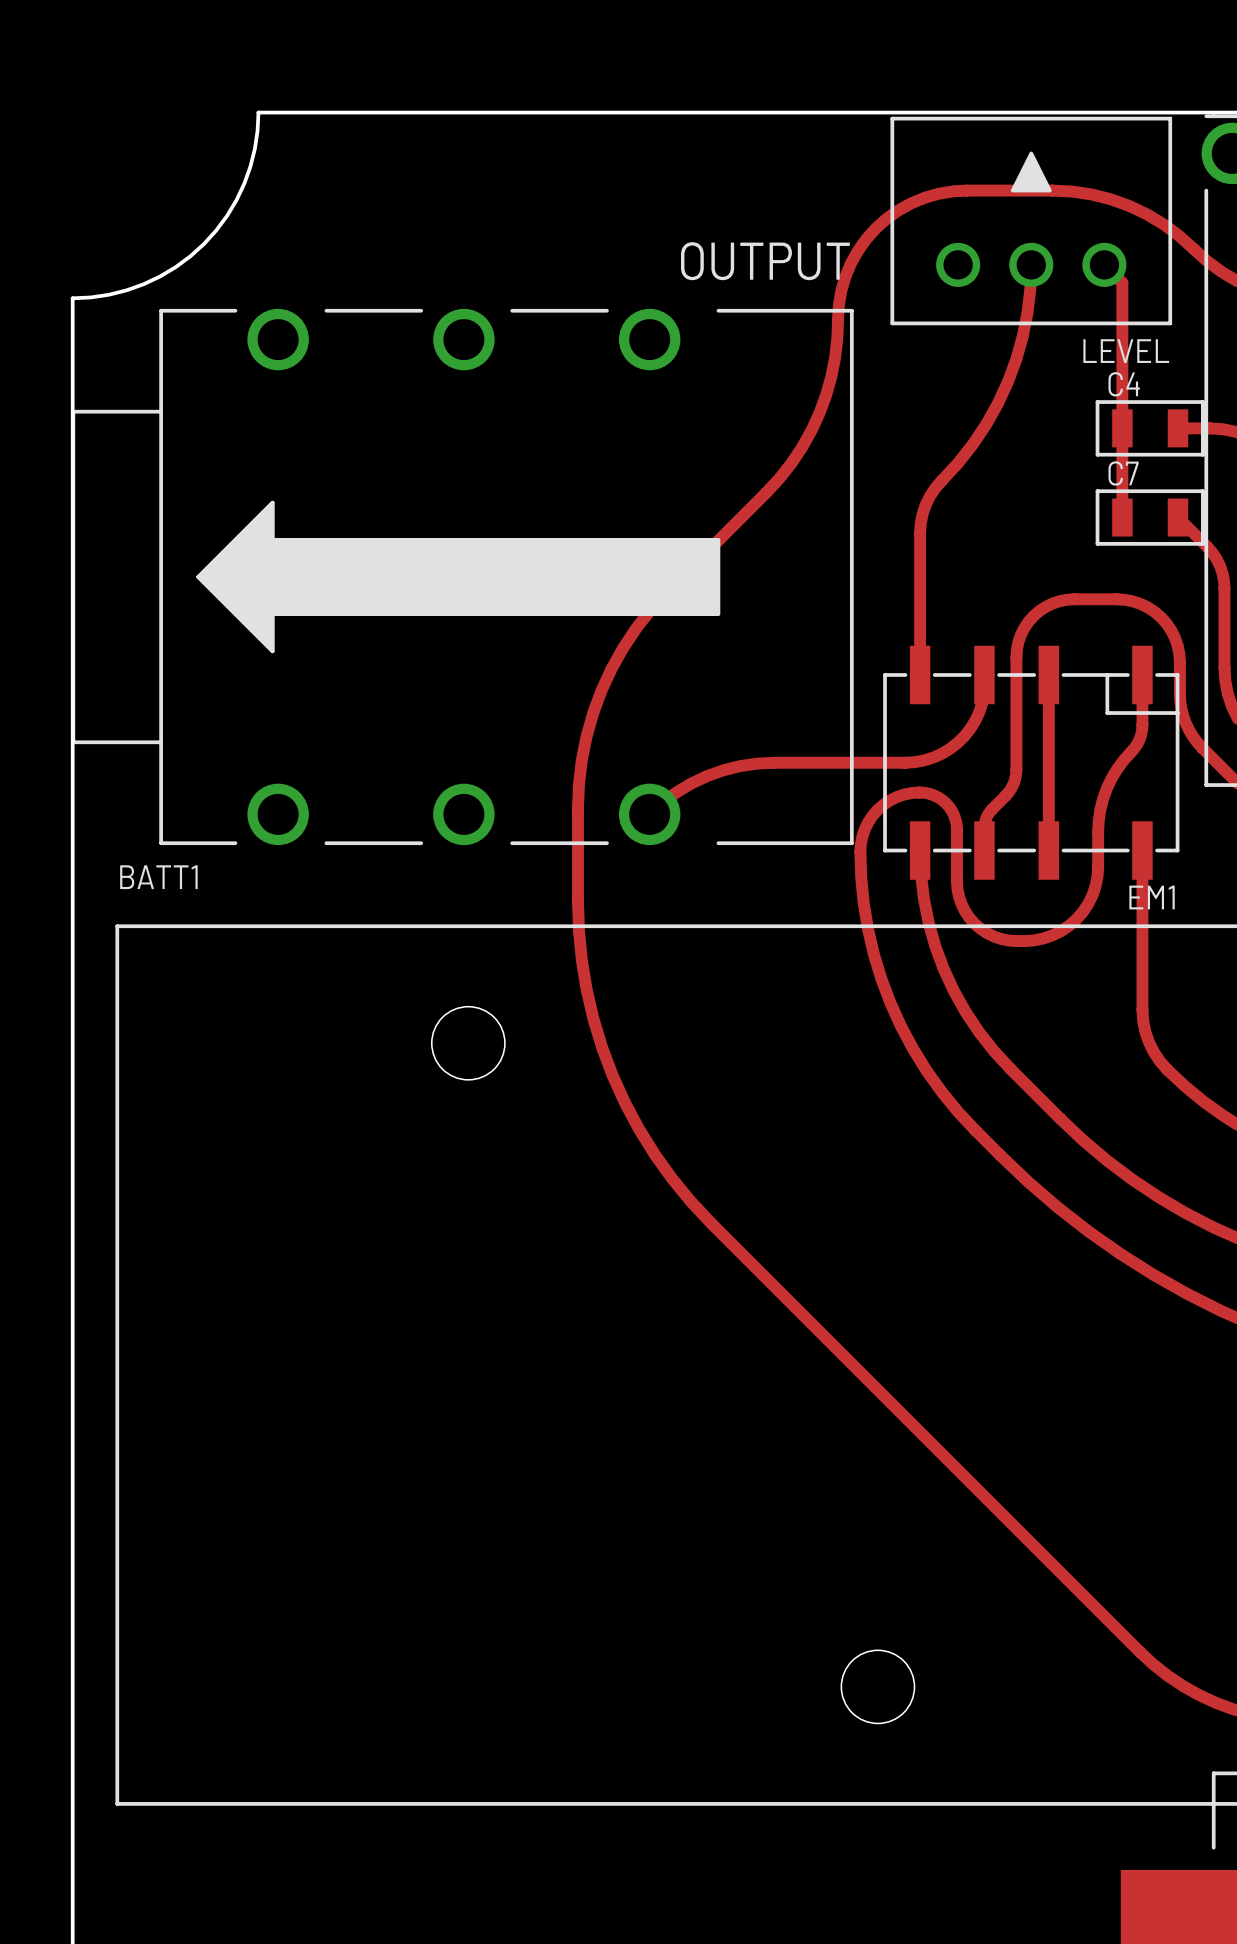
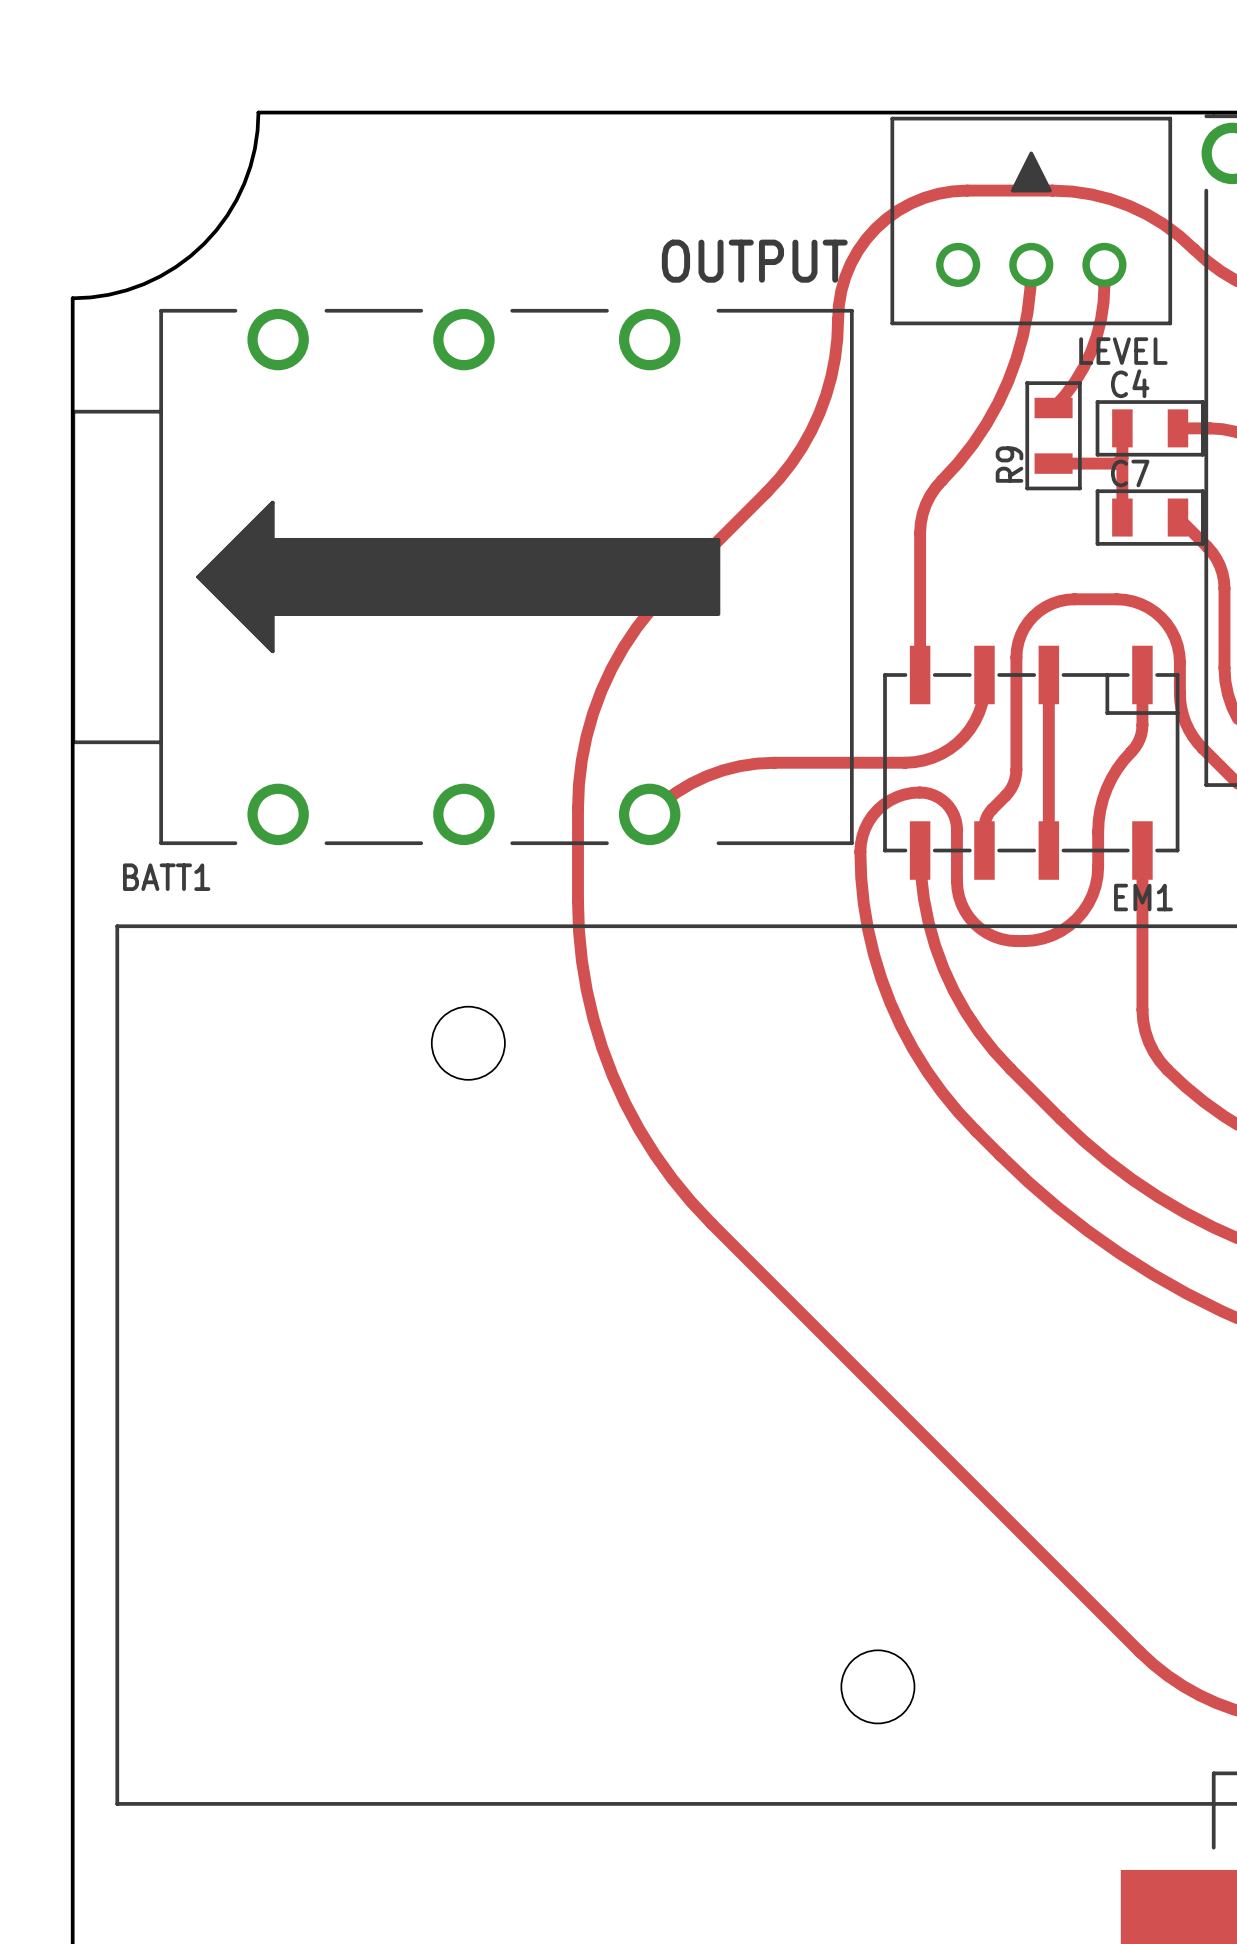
track: (1104, 264) (1122, 282) (1122, 428) -> (1104, 264) (1103, 302) (1096, 335) (1091, 351) (1075, 381) (1053, 408)
R9: none -> (1053, 435)
track: none -> (1122, 458) (1116, 463) (1053, 463)

